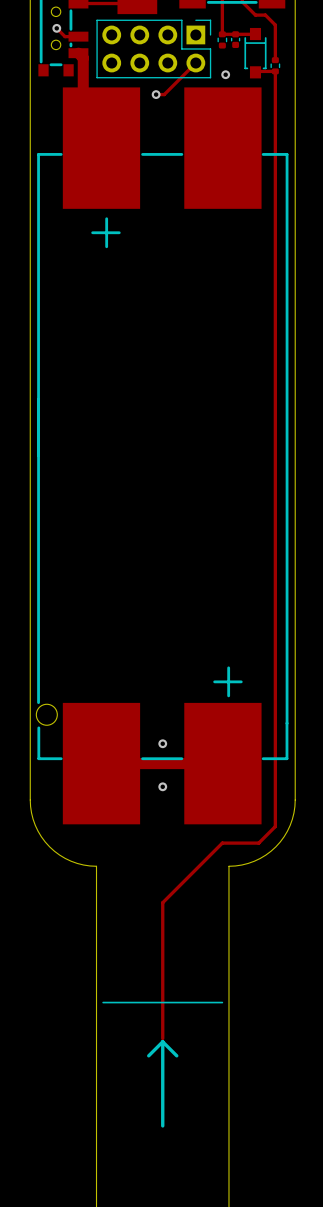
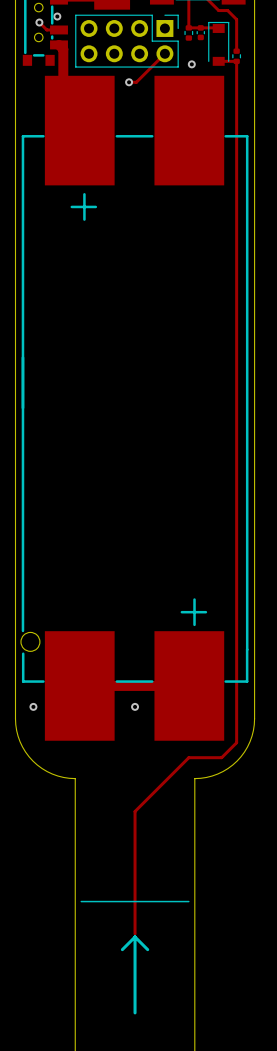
via: none -> (57, 16)
part footprint: [244, 27, 267, 79] -> [208, 21, 230, 66]
via: (162, 743) -> none
via: none -> (33, 706)

